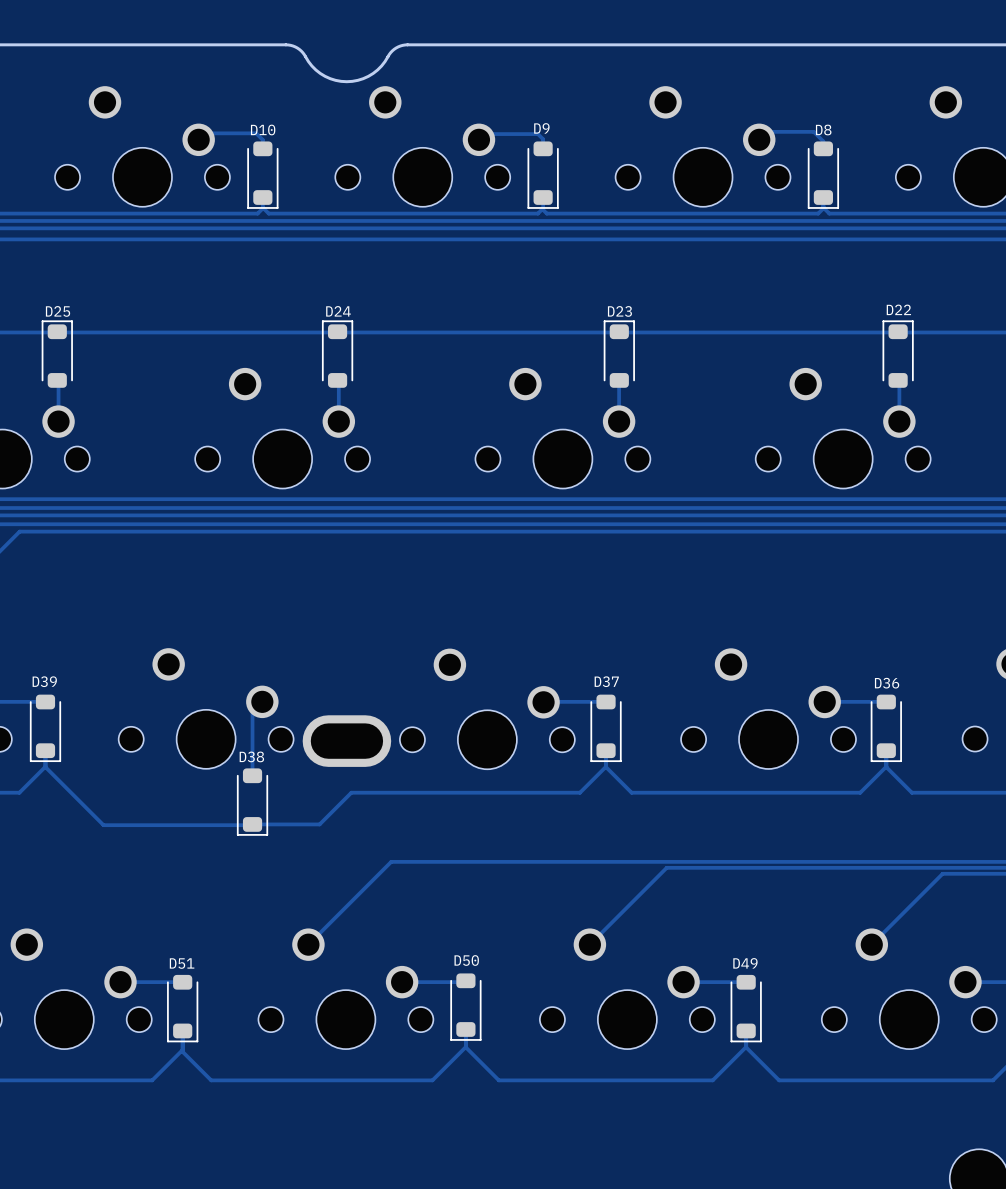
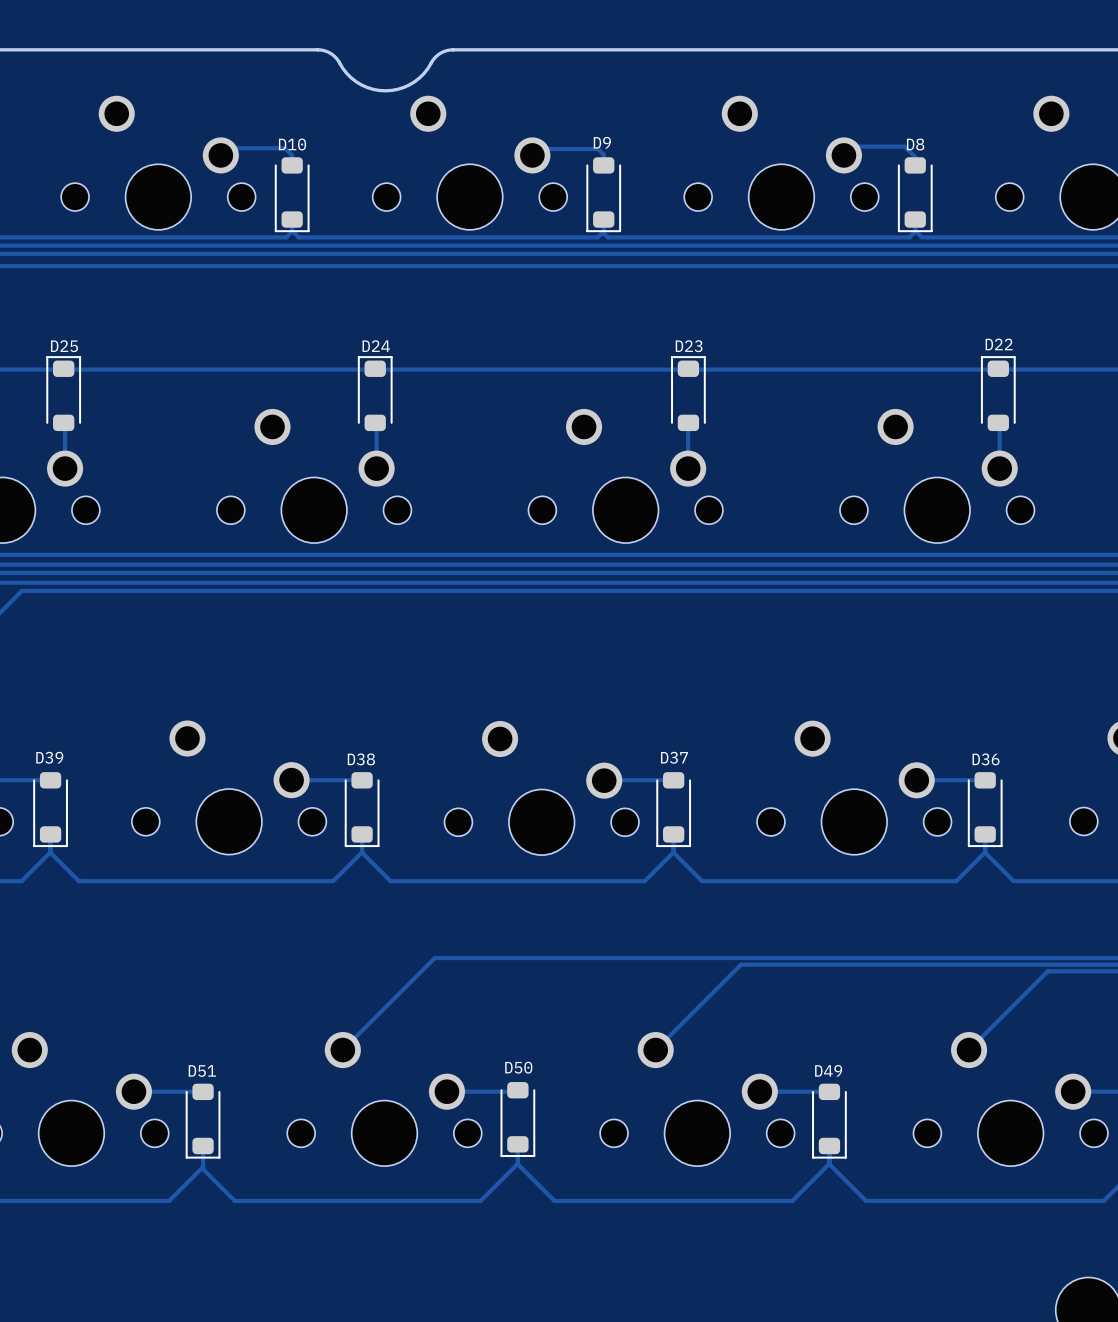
track: (262, 701) (252, 711) (252, 775) -> (291, 780) (361, 780)
part: (346, 741) -> none
track: none -> (362, 834) (362, 852) (390, 881)
track: (351, 792) (319, 824) (251, 825) (103, 825) (71, 792) -> (362, 852) (333, 881) (79, 881)
D38 position: (252, 802) -> (362, 809)

